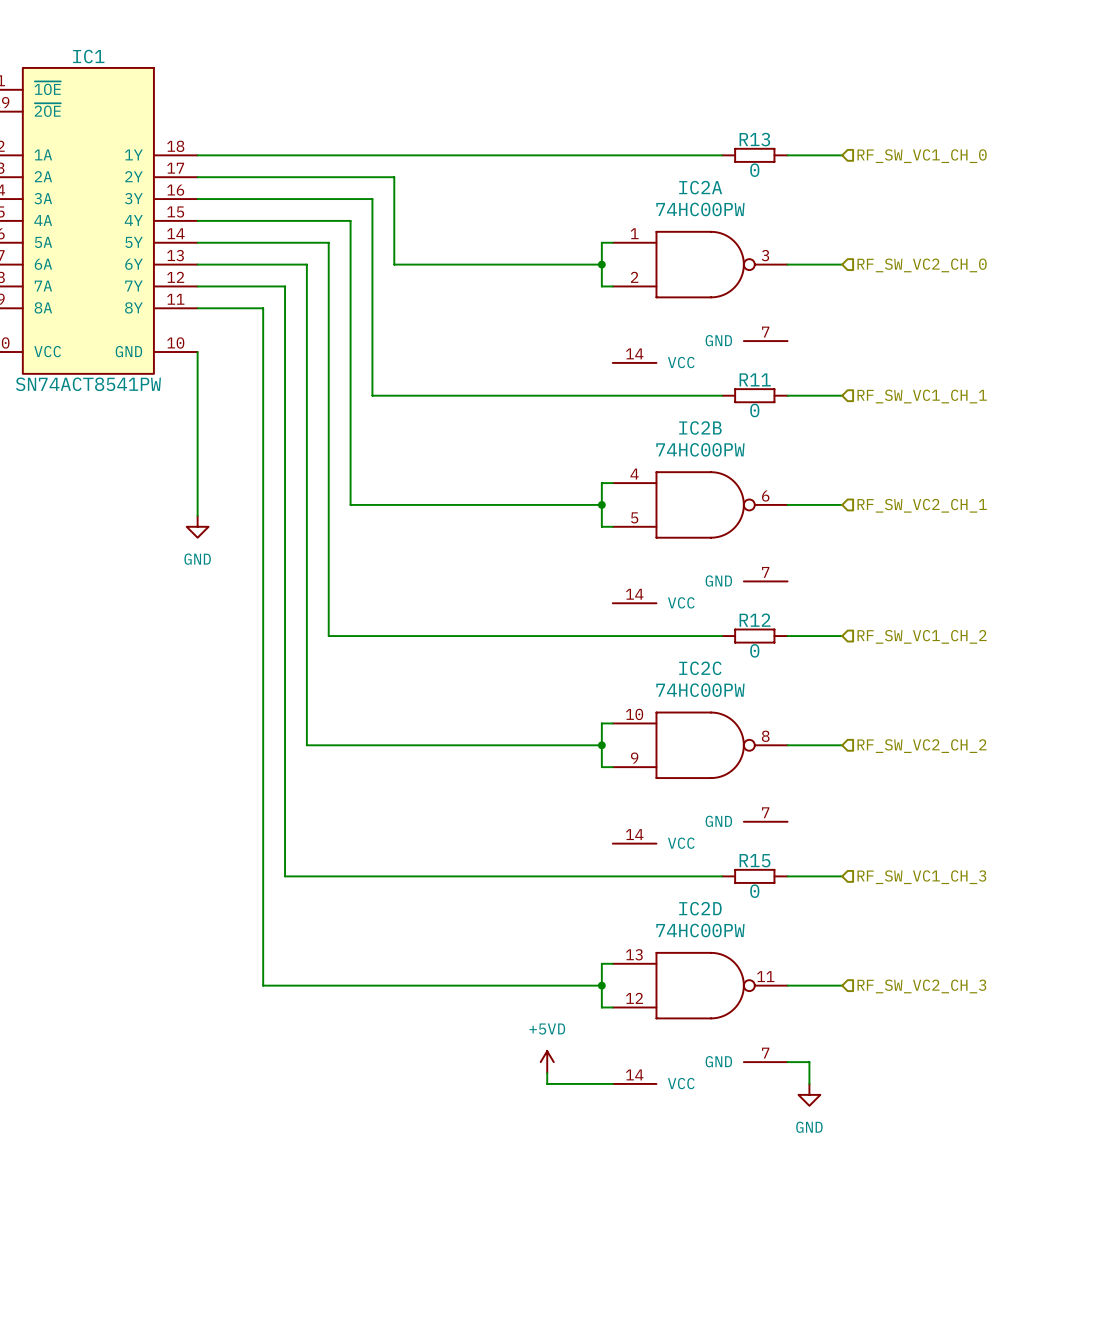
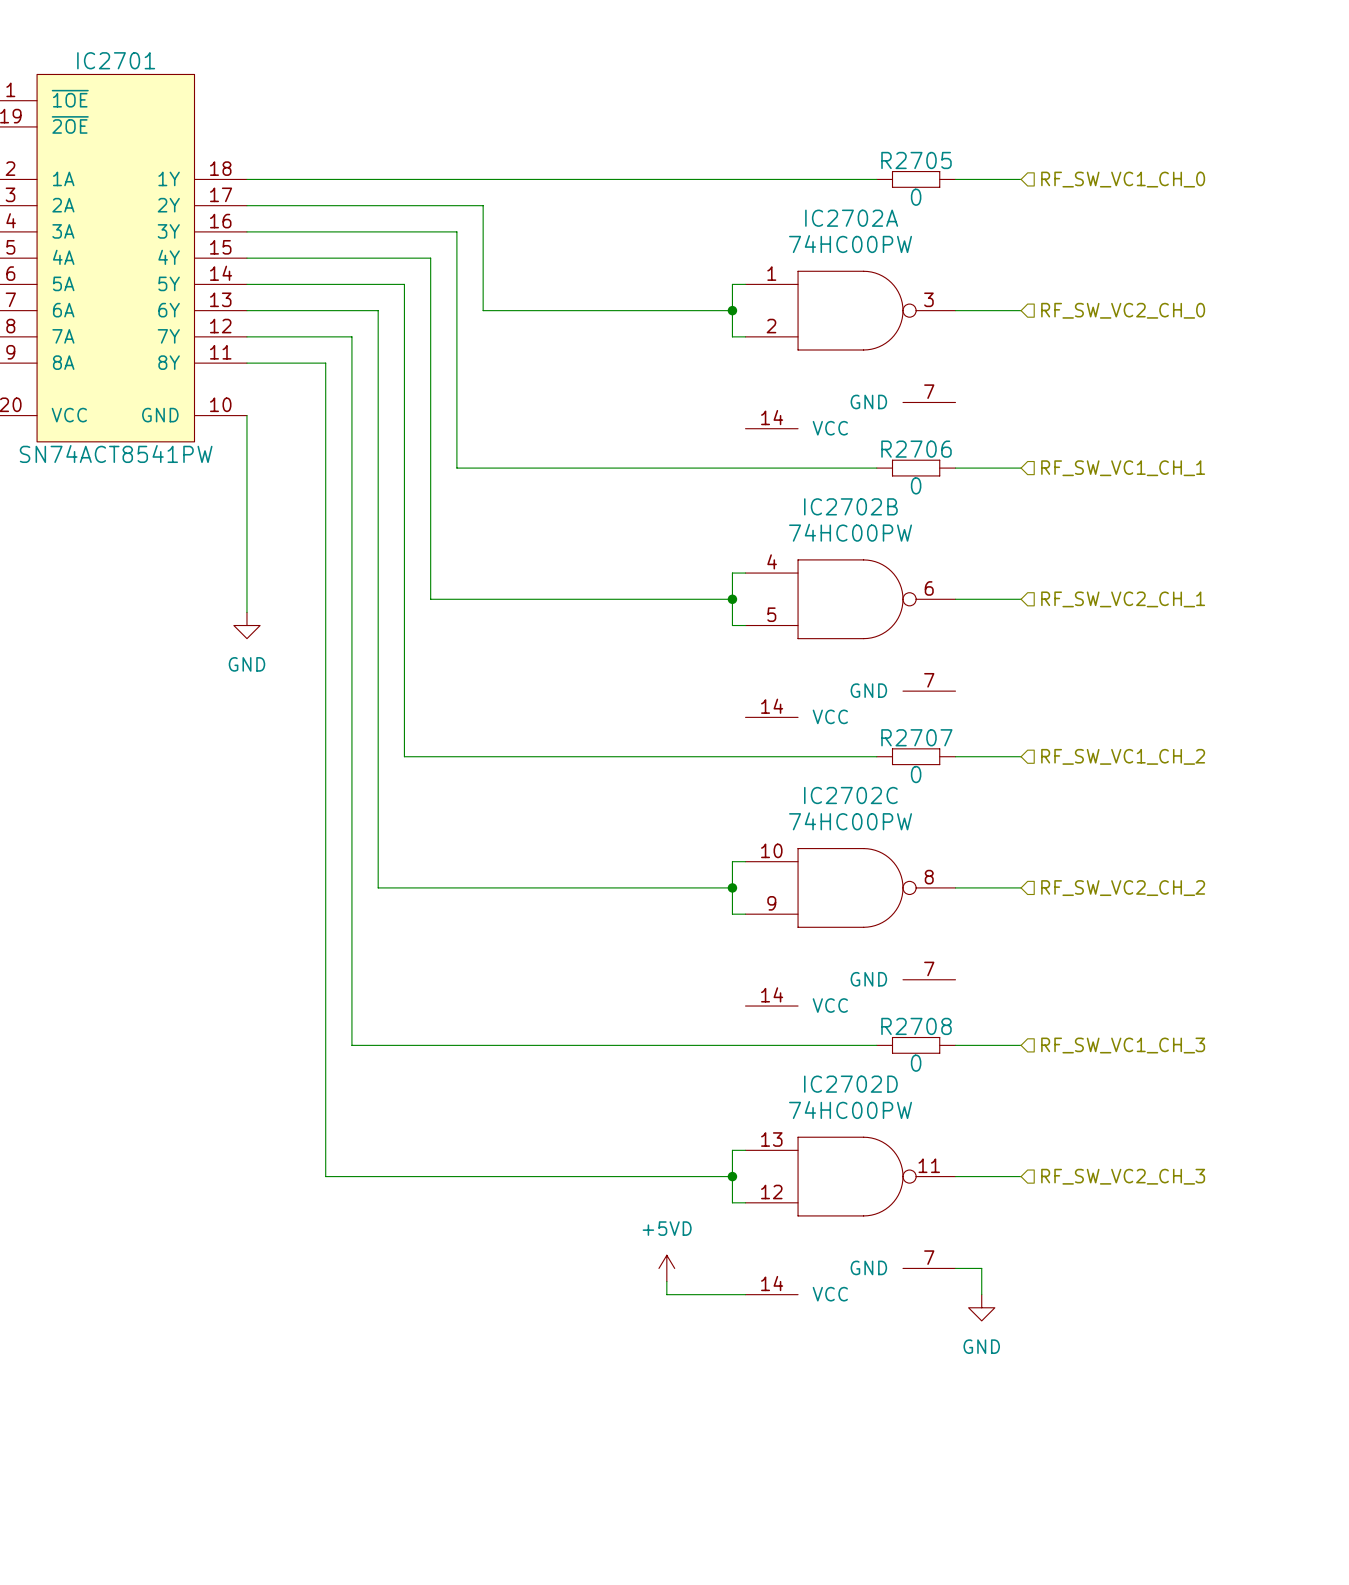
IC1 name: IC1 (88, 56) -> IC2701 (116, 60)
R13 name: R13 (754, 139) -> R2705 (916, 160)
IC2A name: IC2A (700, 187) -> IC2702A (851, 218)
R11 name: R11 (755, 379) -> R2706 (916, 449)
IC2B name: IC2B (700, 427) -> IC2702B (850, 506)
R12 name: R12 (755, 620) -> R2707 (916, 737)
IC2C name: IC2C (700, 668) -> IC2702C (850, 795)
R15 name: R15 (755, 860) -> R2708 (916, 1026)
IC2D name: IC2D (700, 908) -> IC2702D (850, 1084)

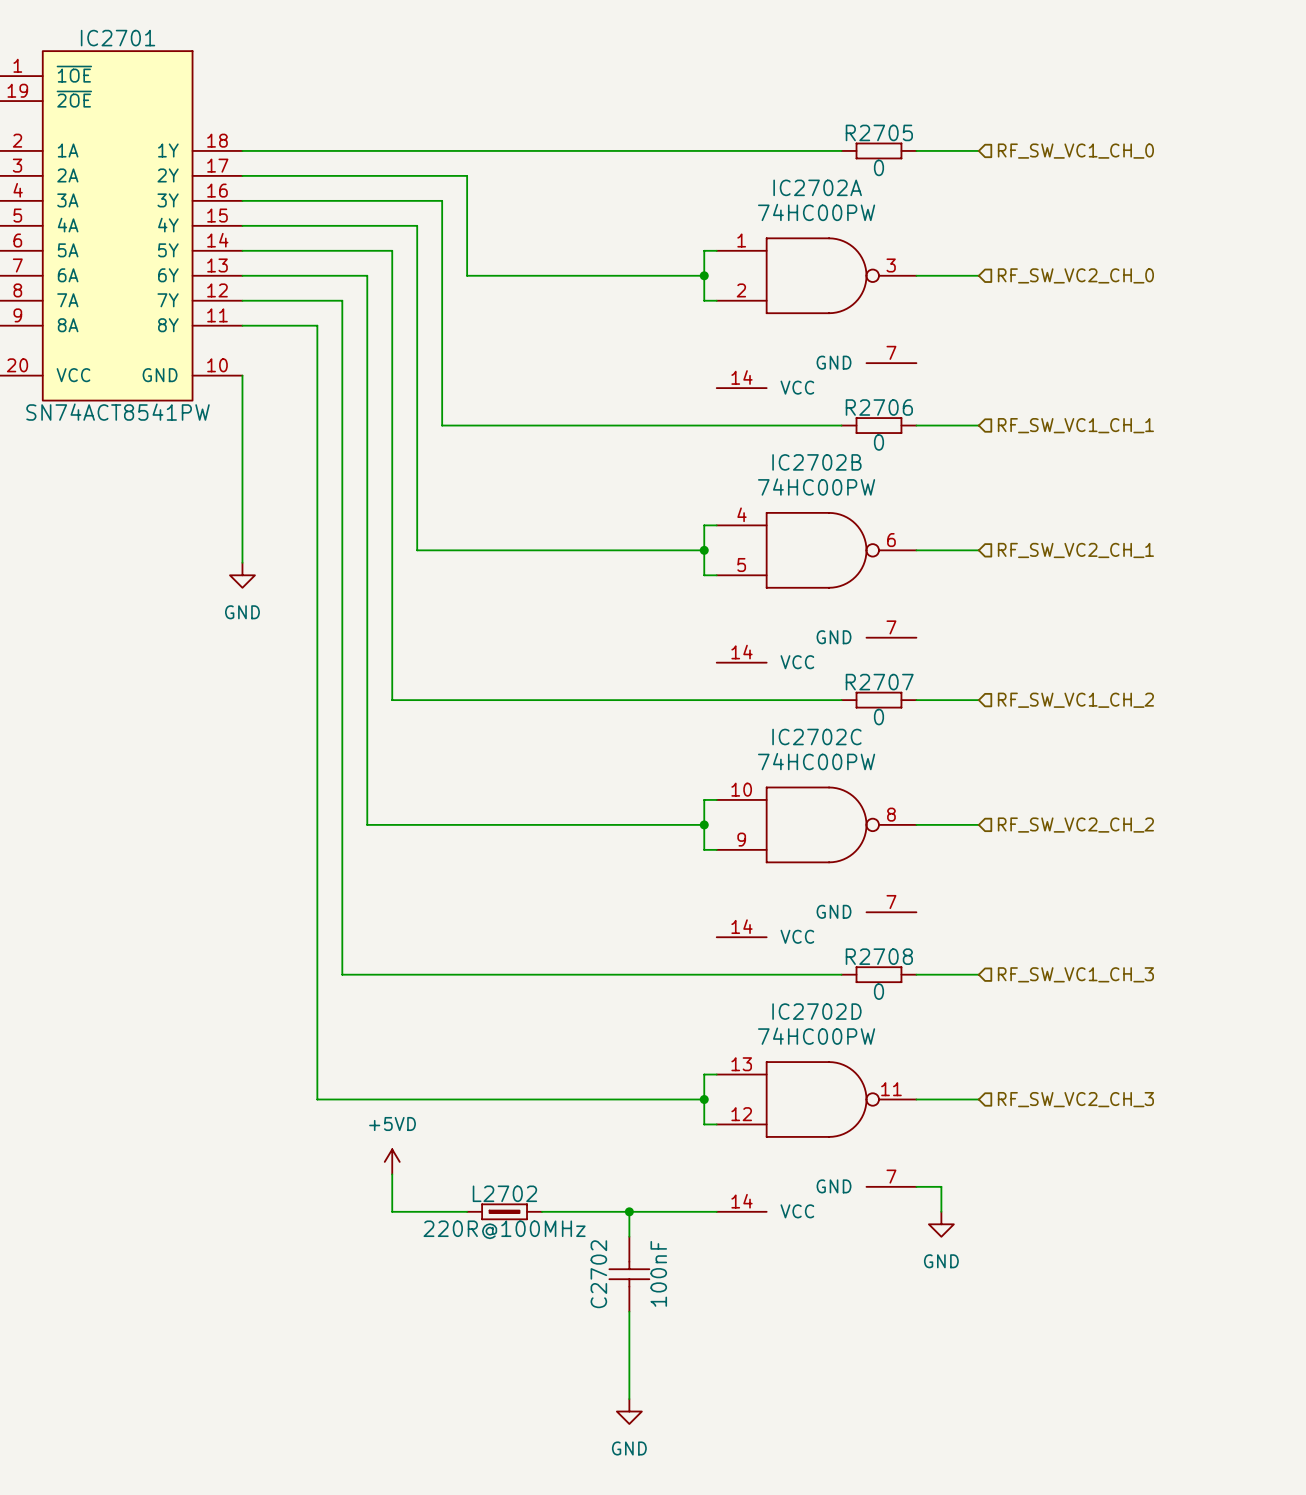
power symbol: none -> +5VD (392, 1161)
wire: none -> (392, 1174) (392, 1211) (467, 1211)
power symbol: +5VD (666, 1268) -> none
wire: (666, 1281) (666, 1294) -> (542, 1211) (641, 1211)
L2702: none -> 220R@100MHz (504, 1211)
wire: none -> (629, 1211) (629, 1236)
junction: none -> (629, 1211)
C2702: none -> 100nF (629, 1274)
wire: none -> (629, 1311) (629, 1399)
power symbol: none -> GND (629, 1411)

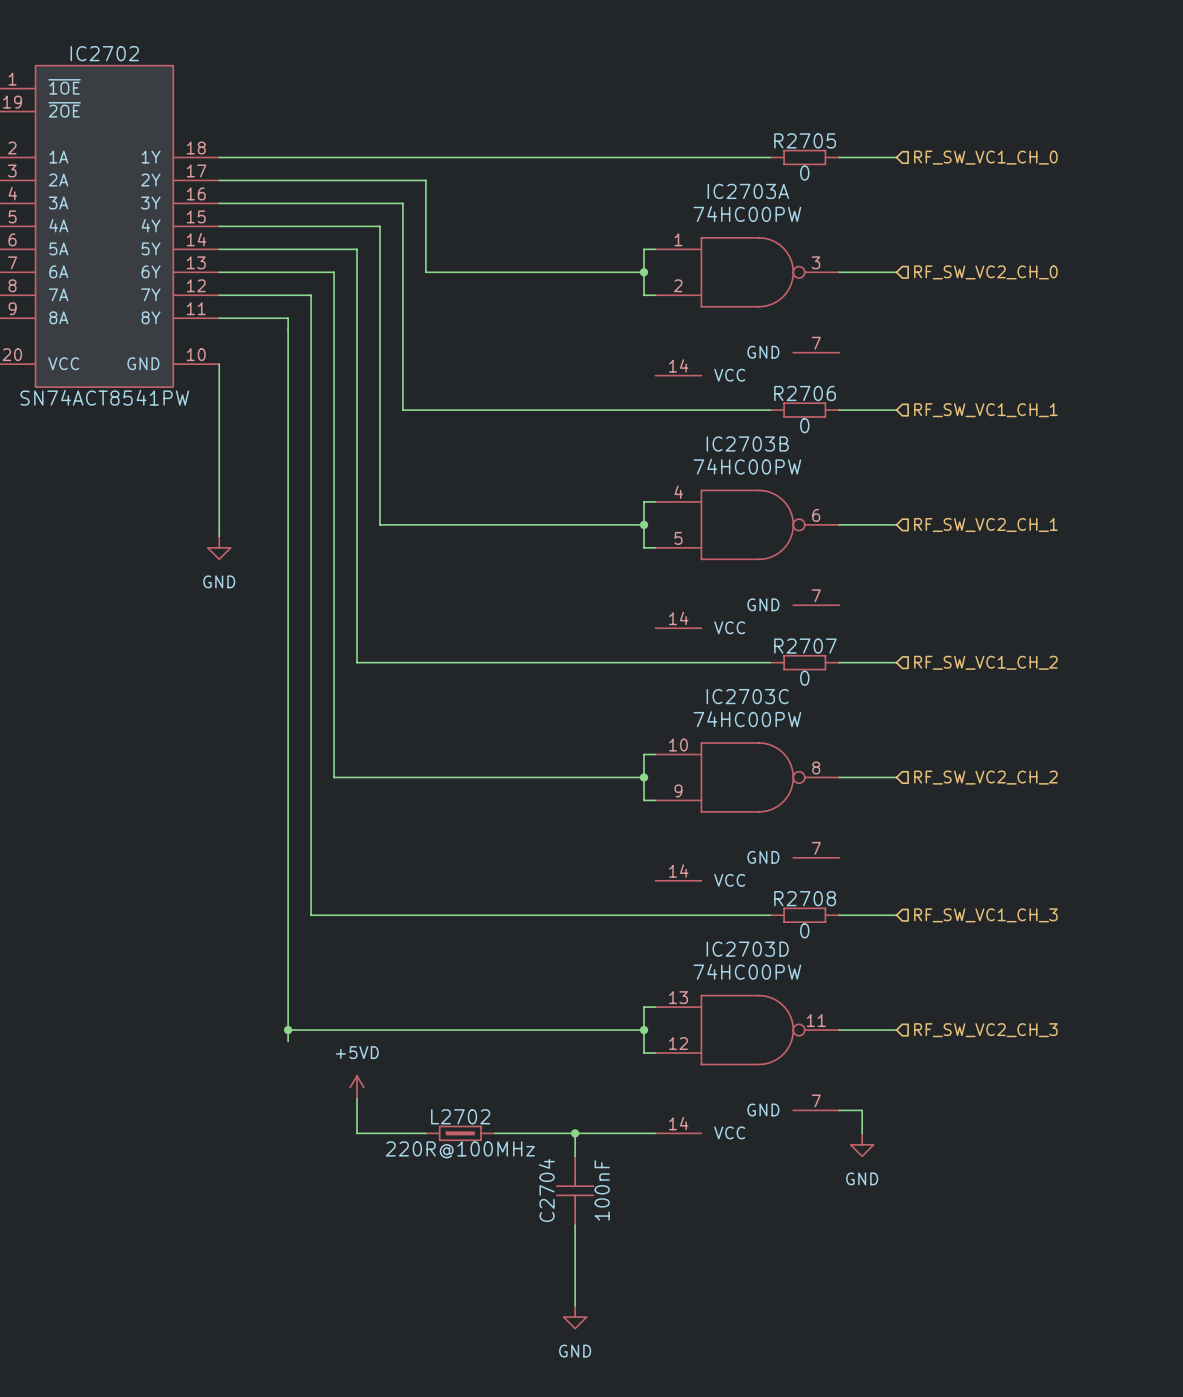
IC2701 name: IC2701 (118, 38) -> IC2702 (104, 53)
IC2702A name: IC2702A (817, 187) -> IC2703A (748, 191)
IC2702B name: IC2702B (816, 462) -> IC2703B (747, 444)
IC2702C name: IC2702C (816, 737) -> IC2703C (747, 696)
IC2702D name: IC2702D (816, 1011) -> IC2703D (747, 949)
wire: none -> (288, 1030) (288, 1041)
junction: none -> (288, 1030)
C2702 name: C2702 (598, 1274) -> C2704 (546, 1190)

